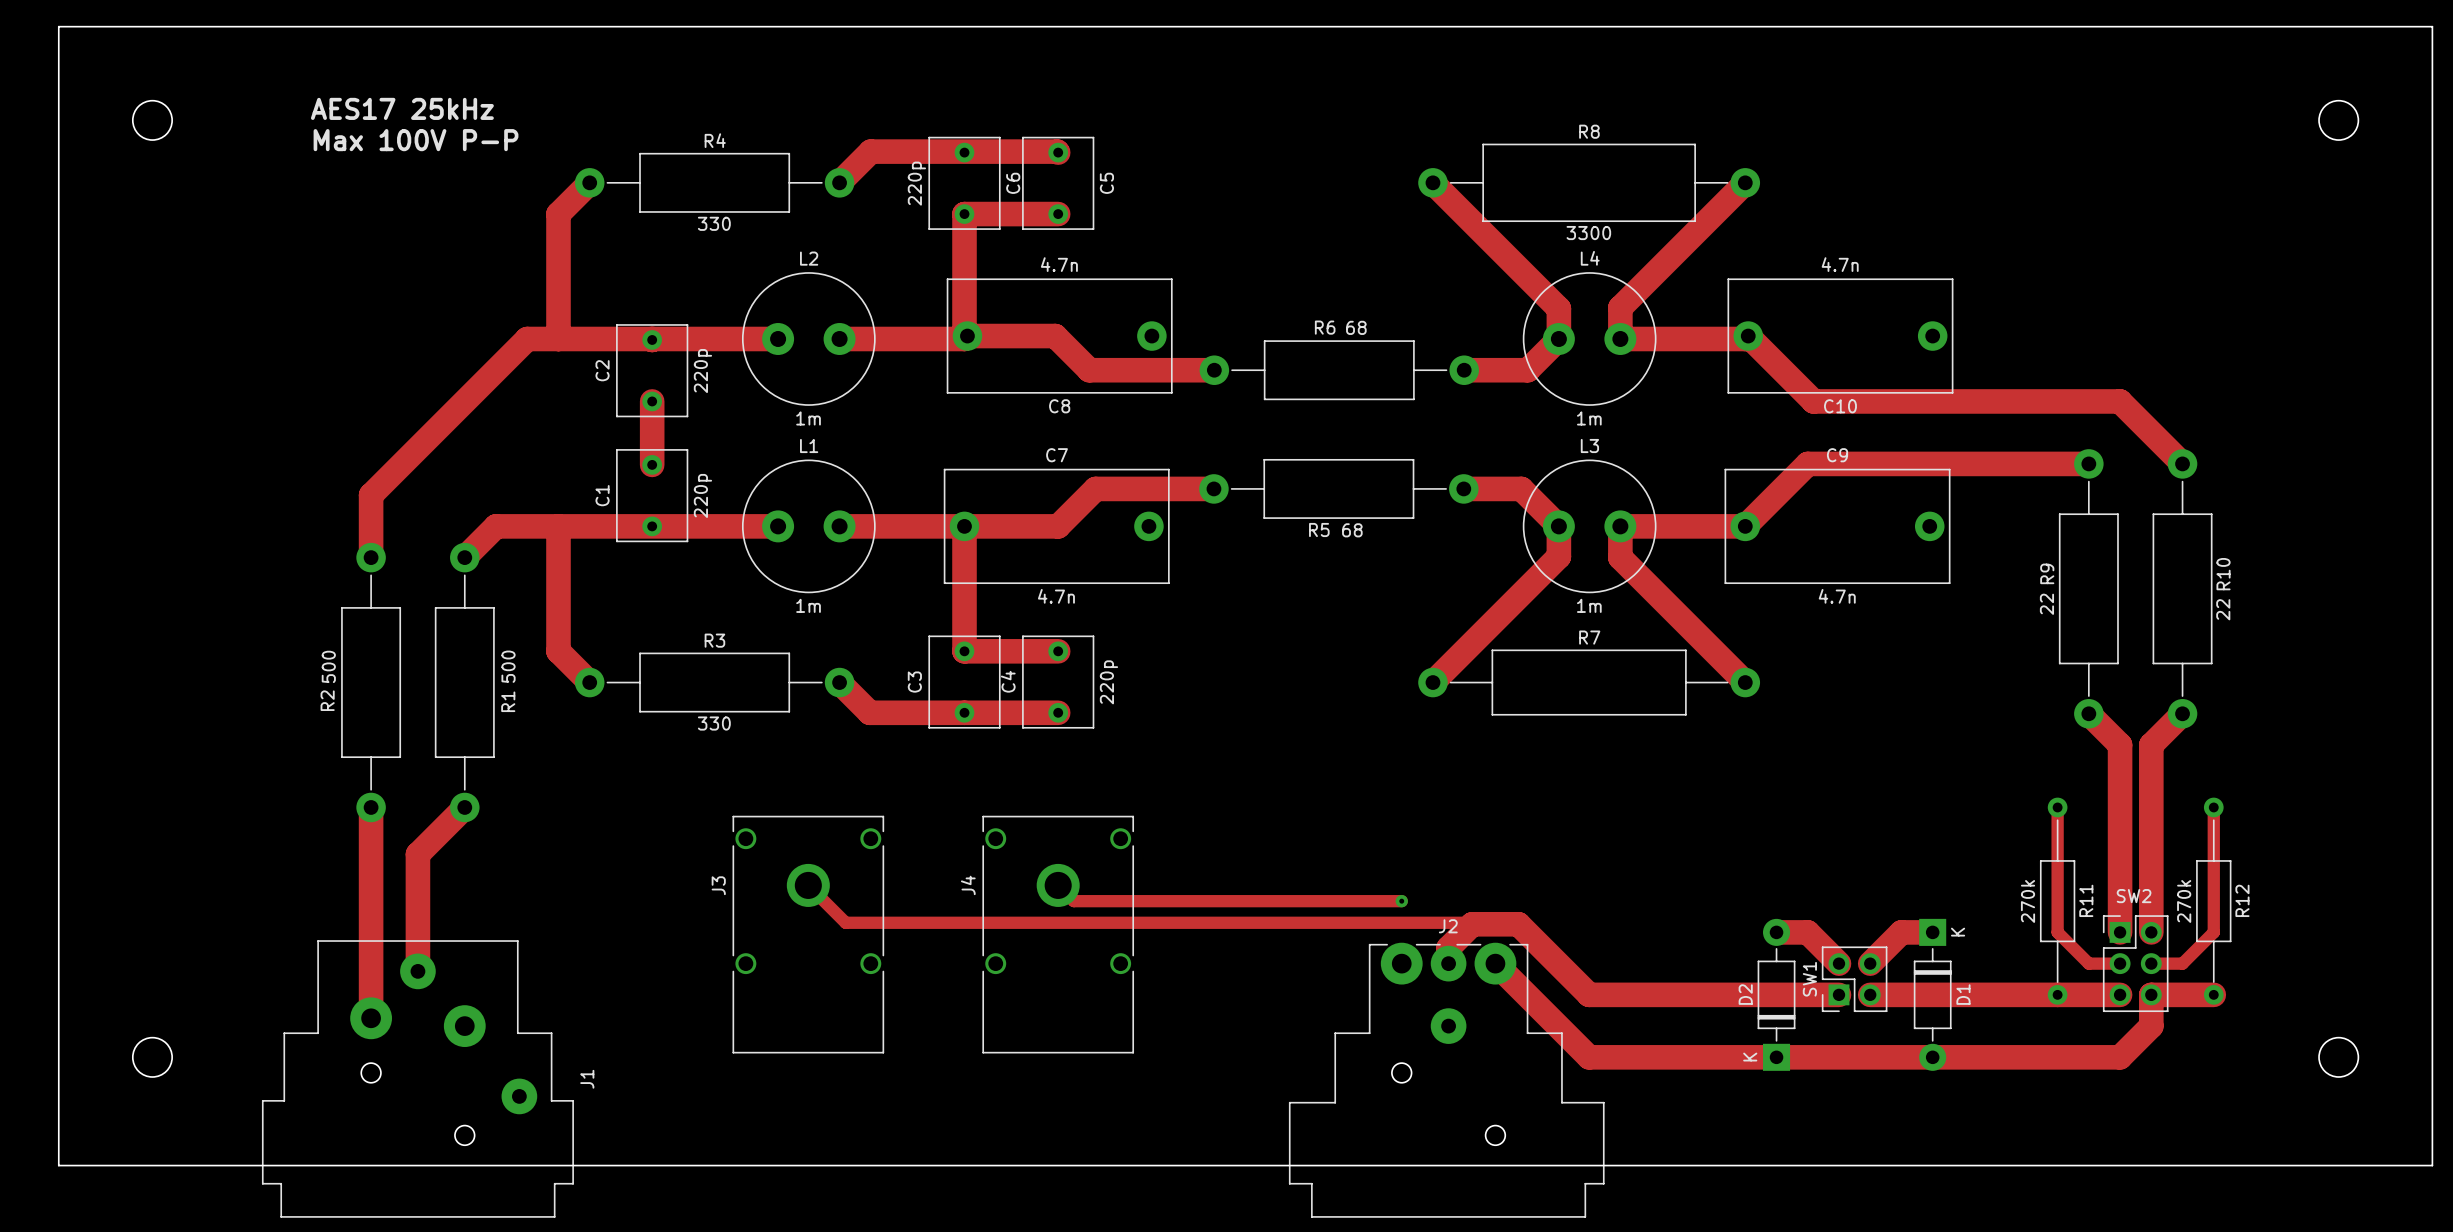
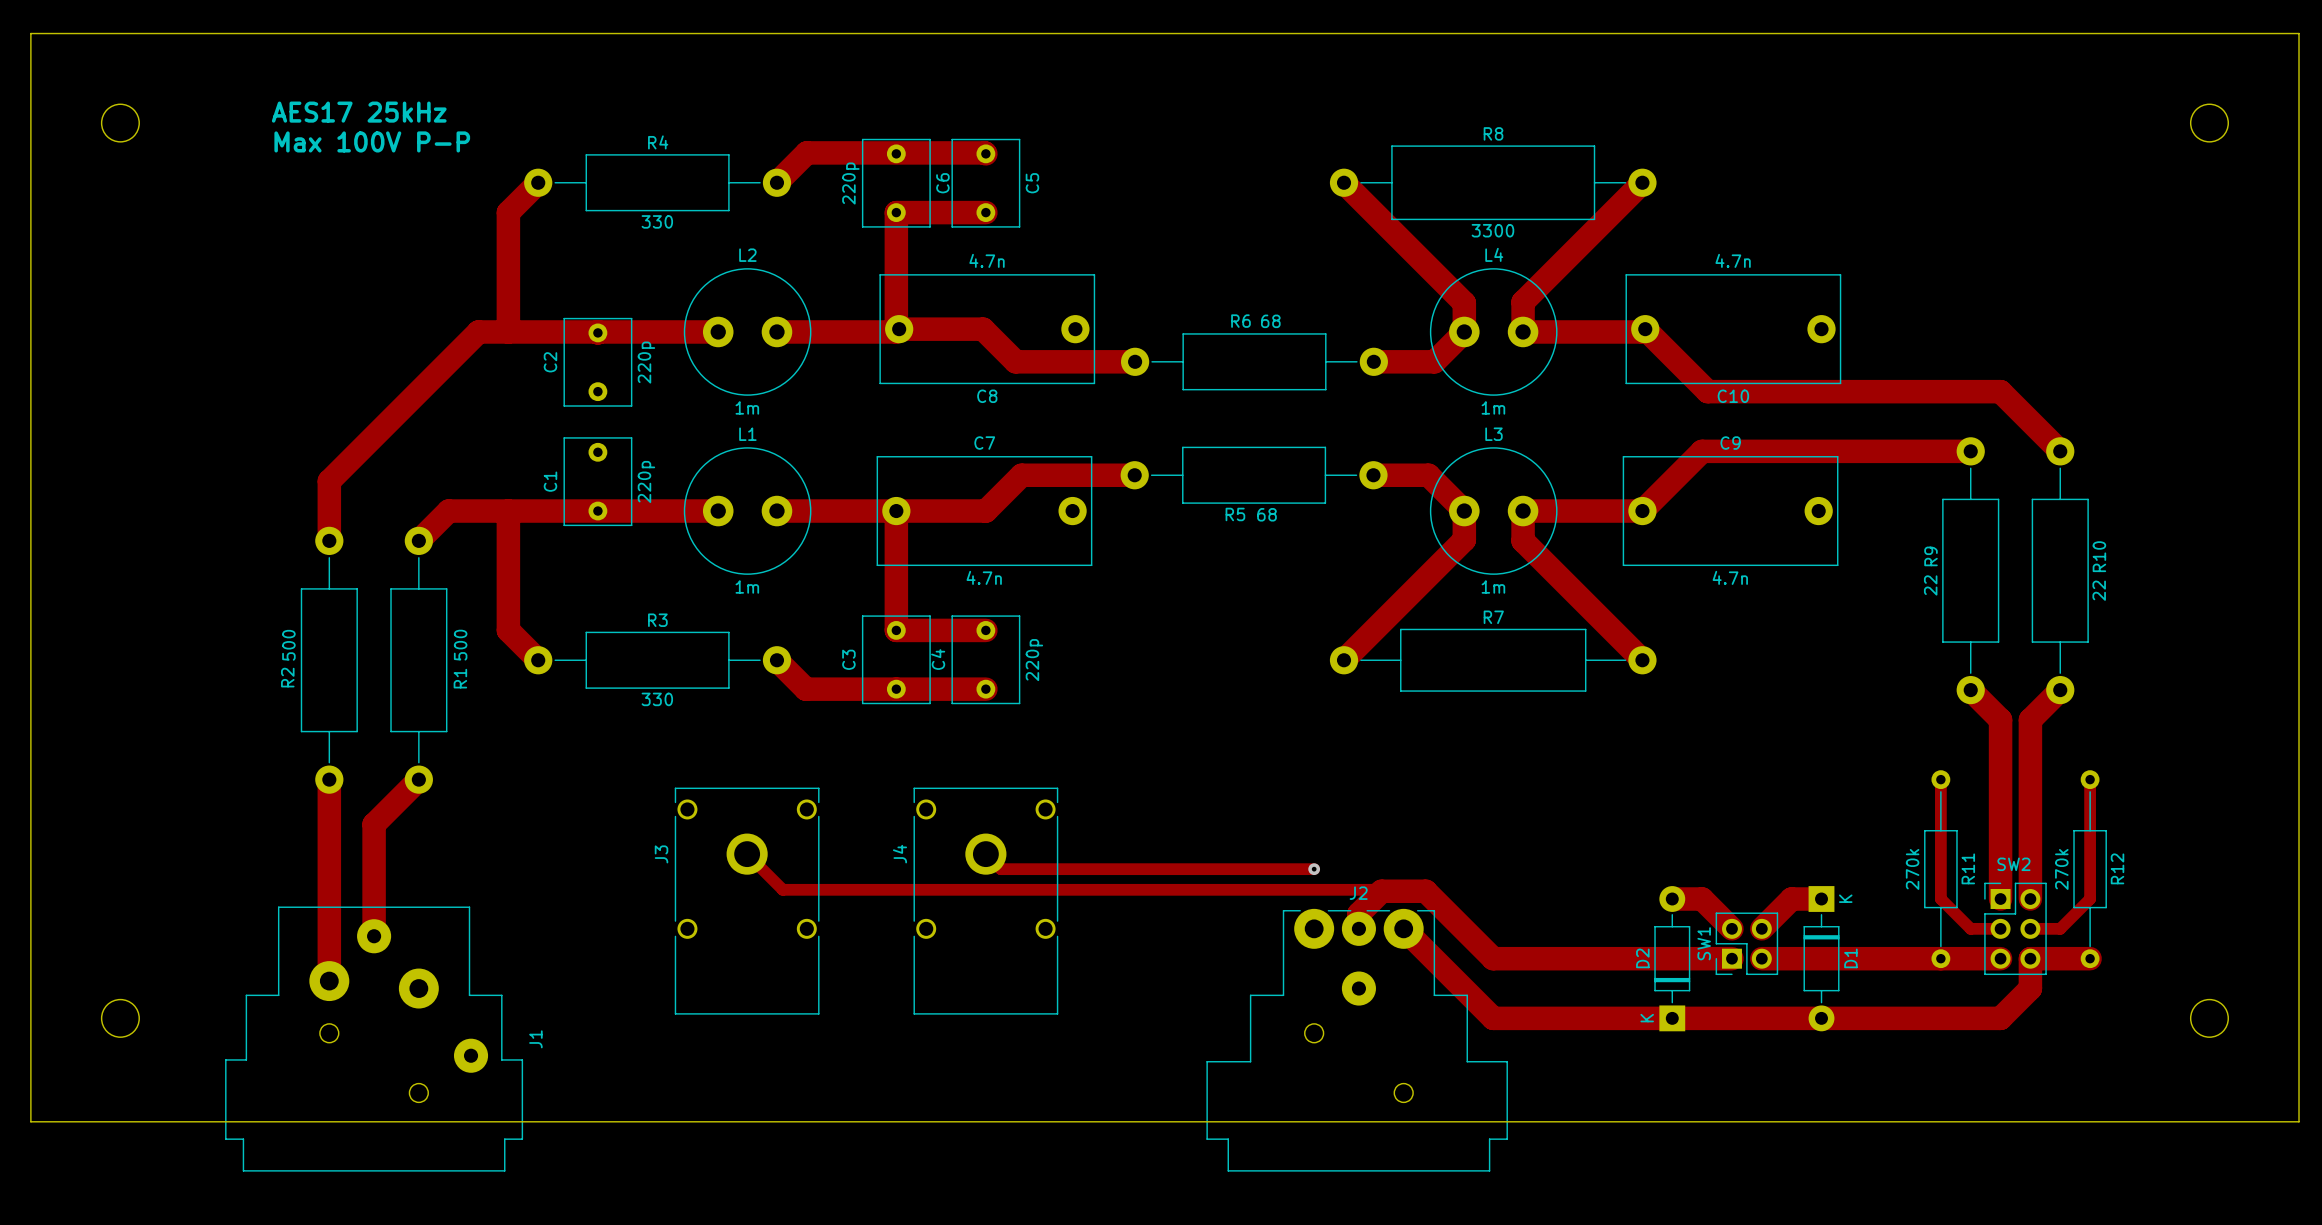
track: (652, 401) (652, 464) -> none

